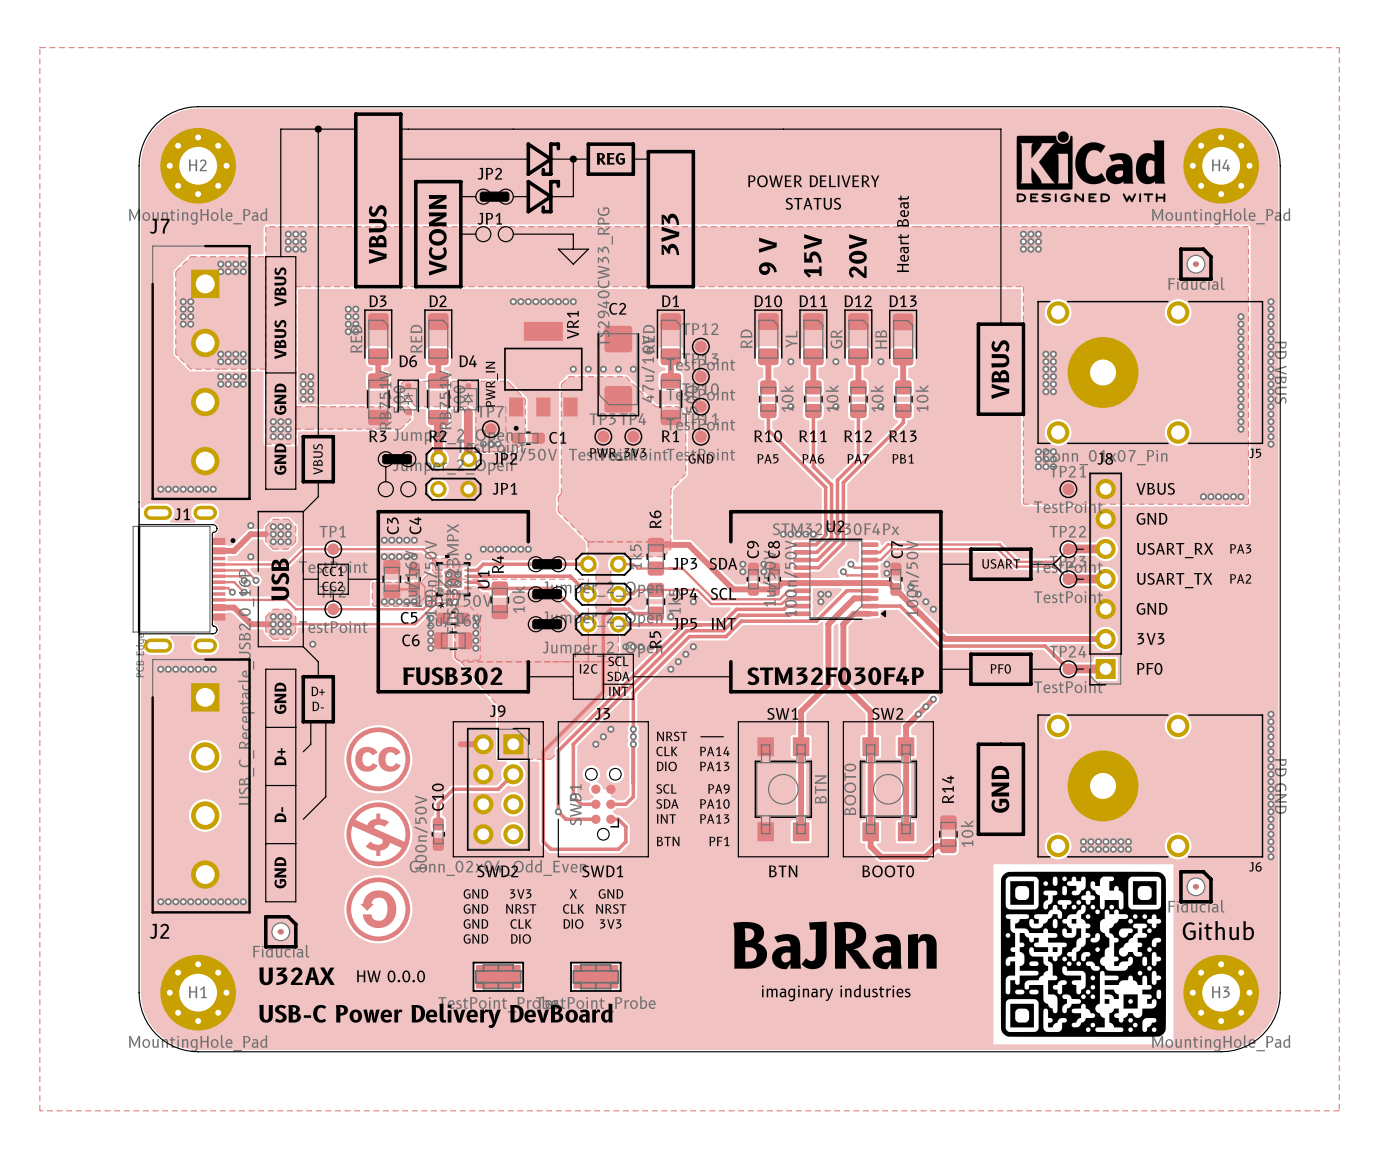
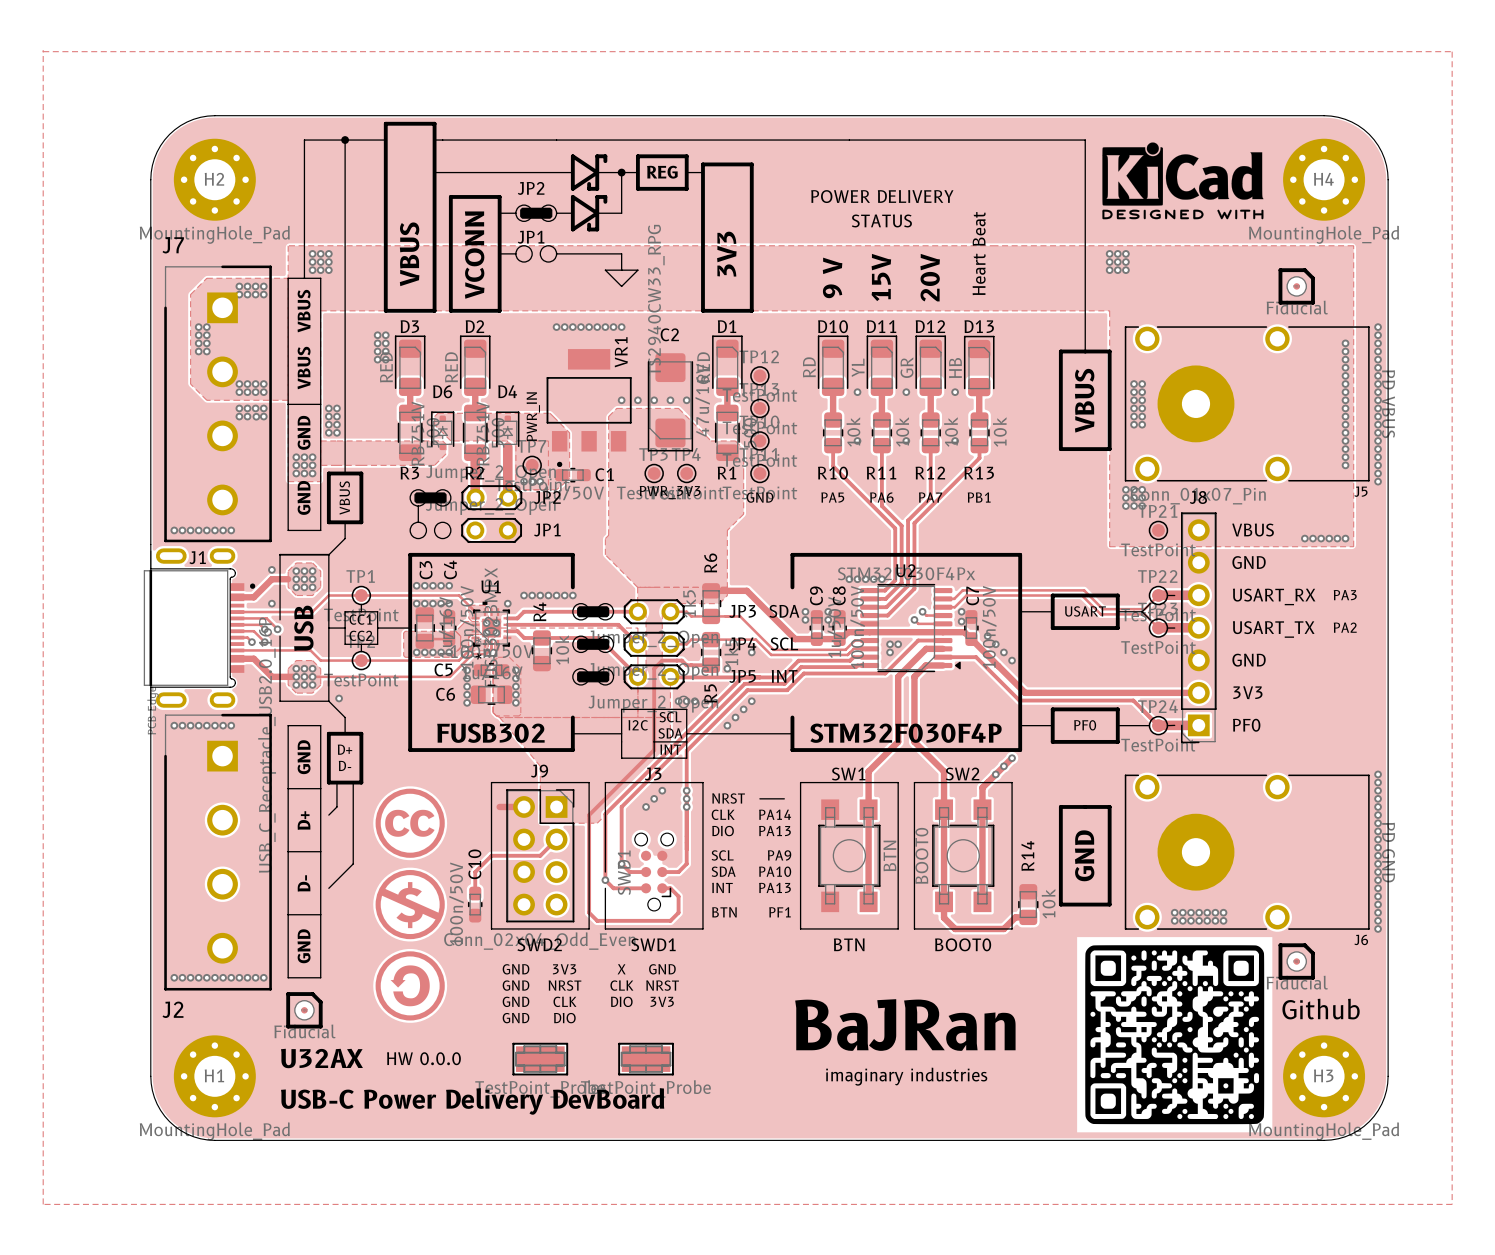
U1 name rotation: 0° (483, 579) -> 90° clockwise (491, 586)
U1 name position: U1 (483, 579) -> U1 (491, 586)

